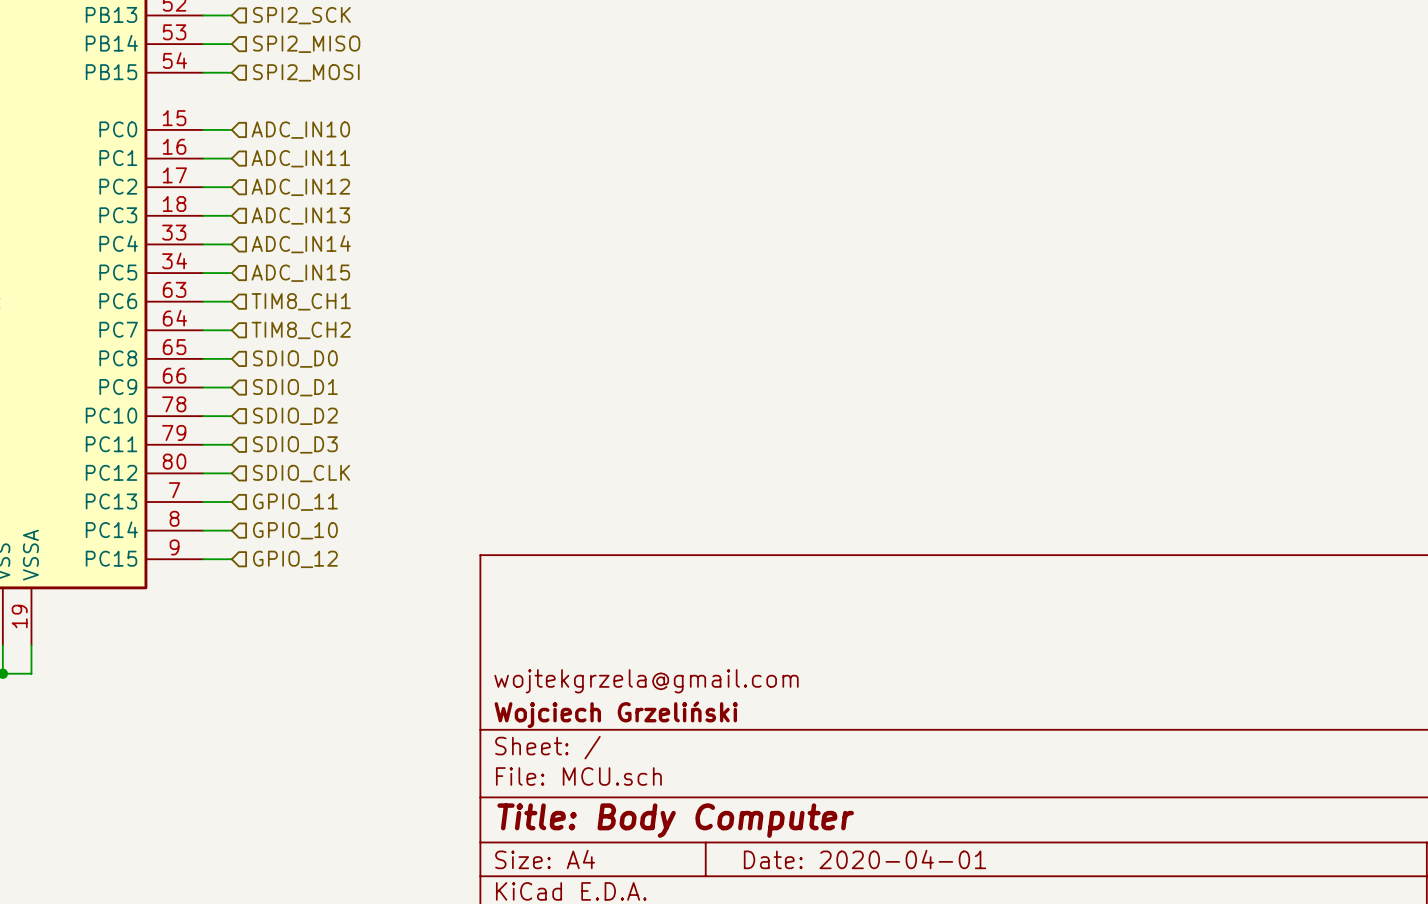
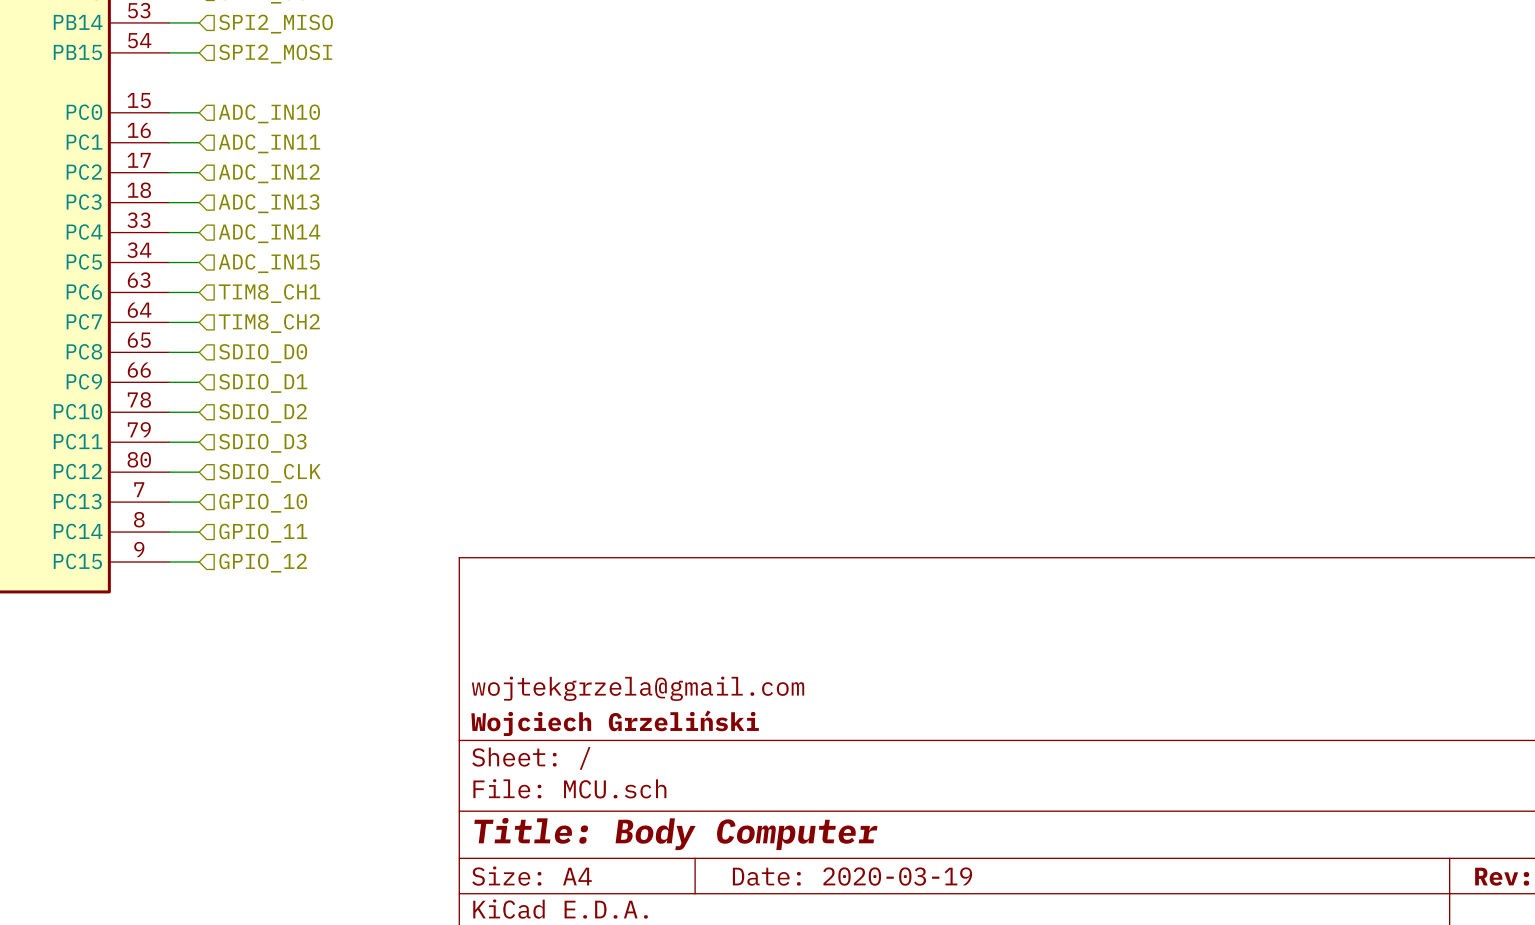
hierarchical label: GPIO_11 (295, 502) -> GPIO_10 (263, 503)
hierarchical label: GPIO_10 (295, 530) -> GPIO_11 (263, 533)
title block: Date: 2020-04-01 (865, 859) -> Date: 2020-03-19 (852, 876)

